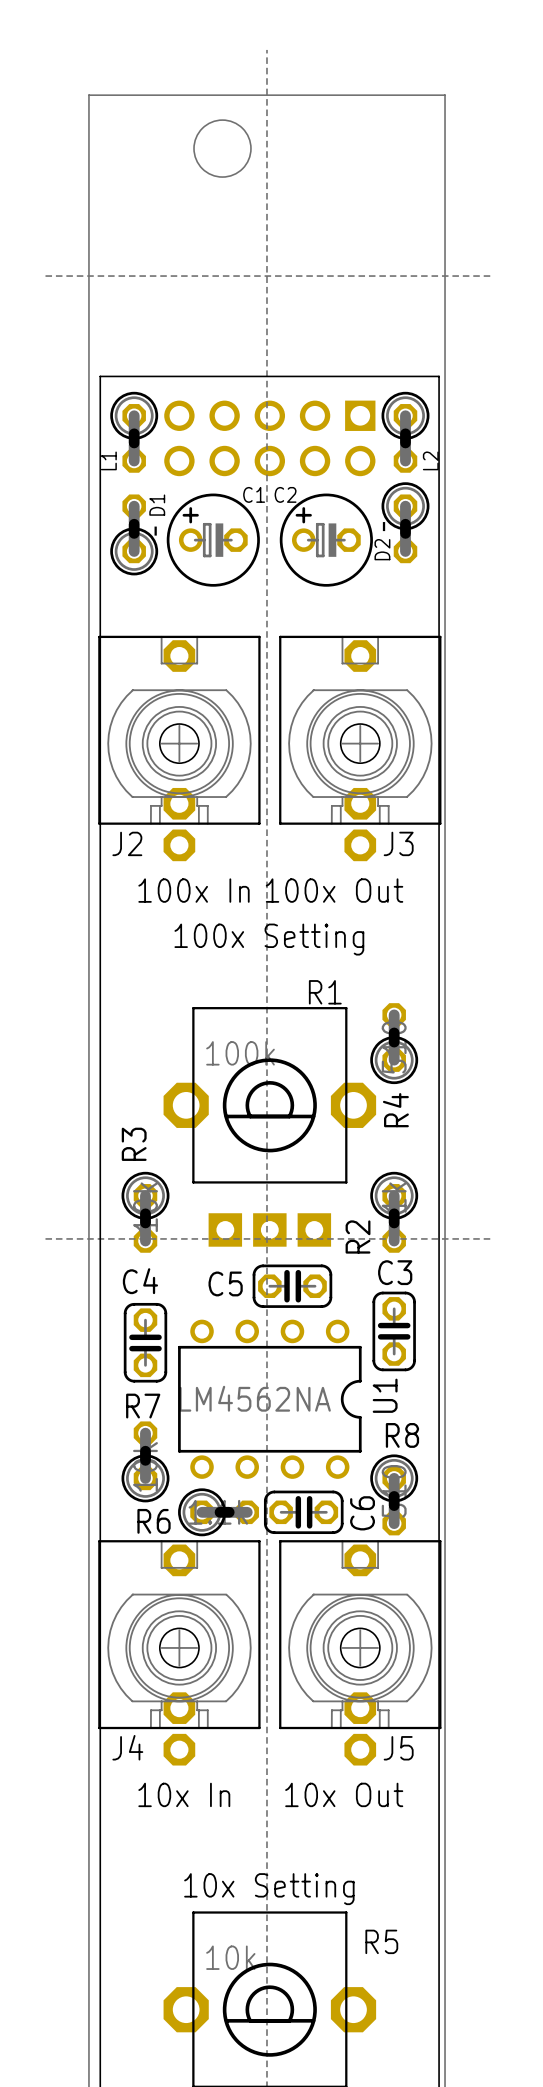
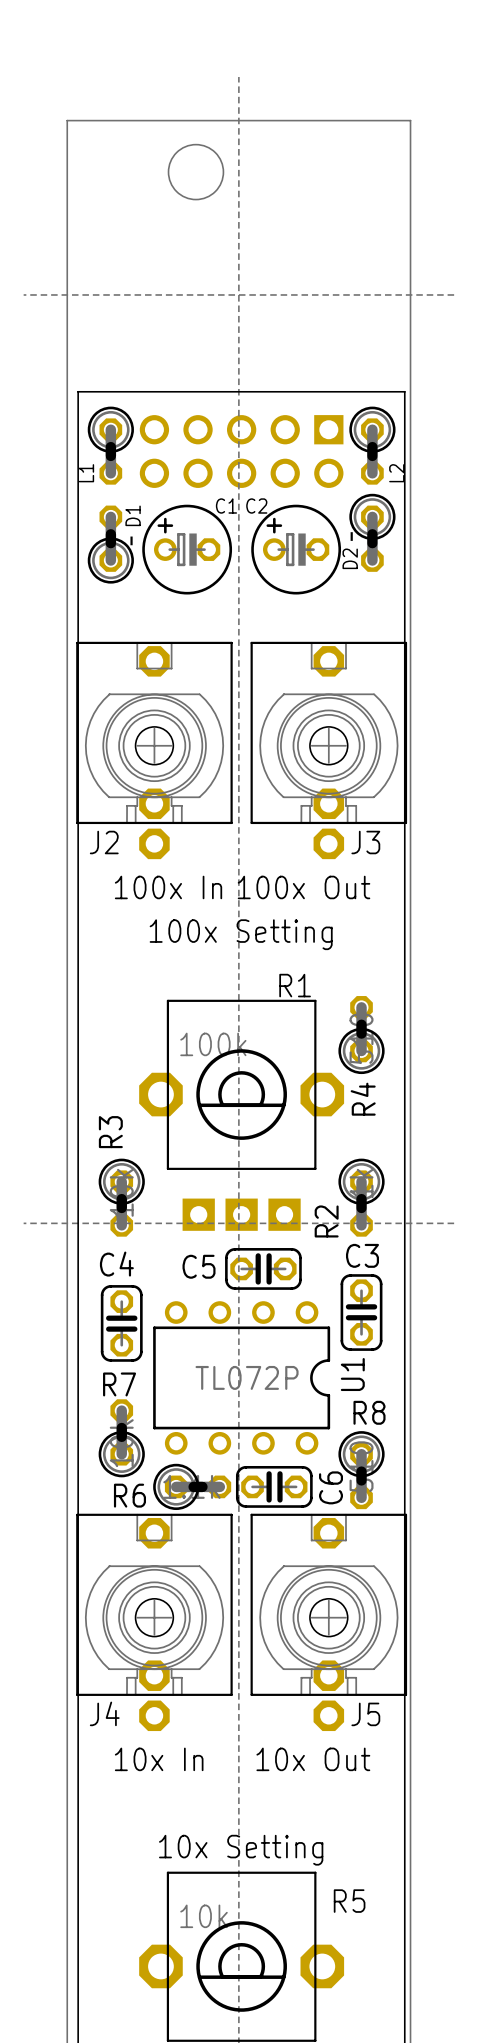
U1 value: LM4562NA (255, 1398) -> TL072P (247, 1377)

